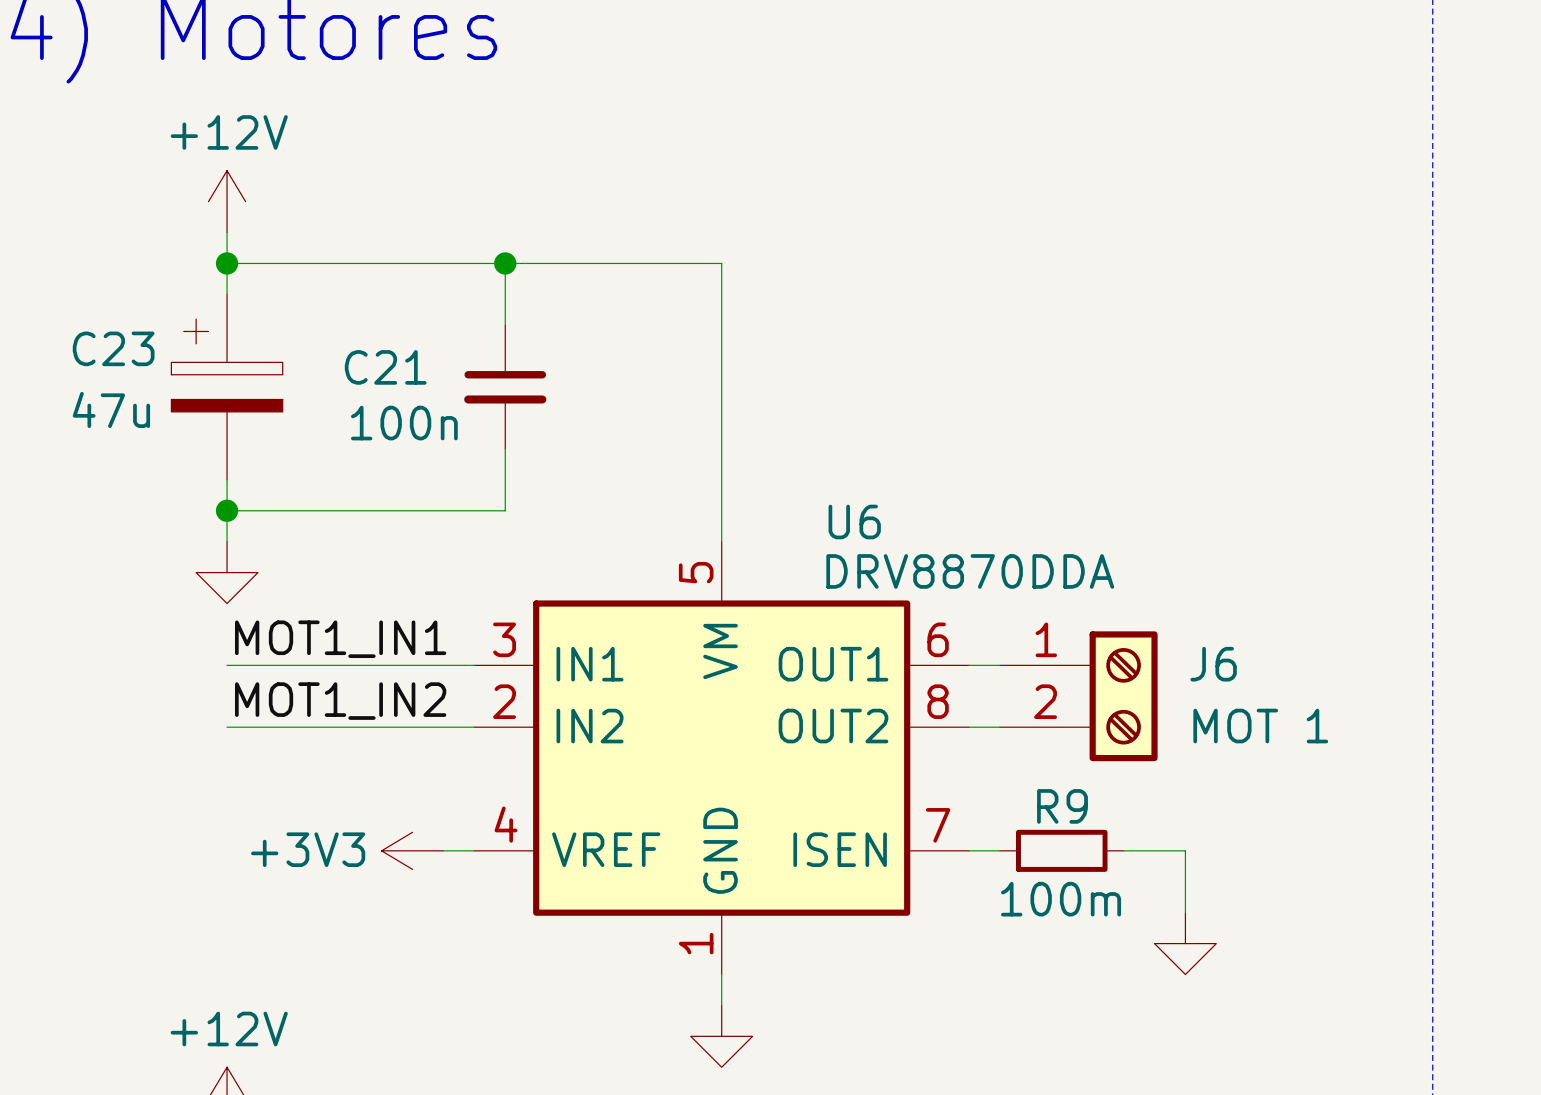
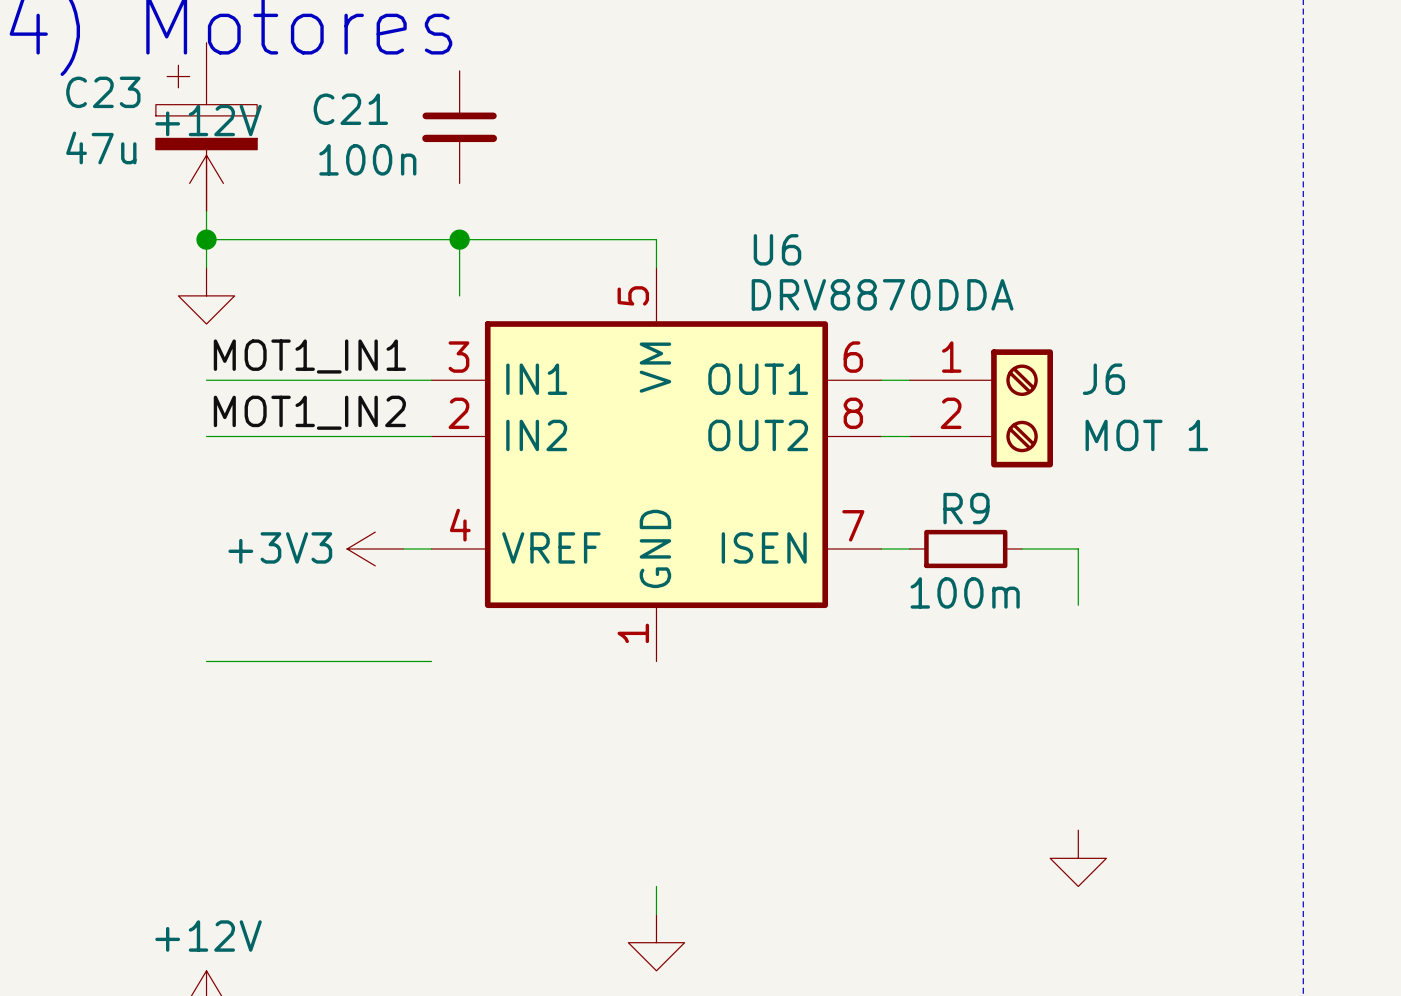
C23 position: (227, 387) -> (206, 127)
C21 position: (505, 387) -> (459, 127)
wire: (505, 448) (505, 510) (227, 510) -> none
wire: (227, 479) (227, 541) -> (206, 436) (431, 436)
junction: (227, 510) -> none
power symbol position: (227, 572) -> (206, 295)
label position: MOT1_IN1 (340, 639) -> MOT1_IN1 (309, 356)
wire: (227, 665) (474, 665) -> (206, 380) (431, 380)
wire: (969, 665) (999, 665) -> (881, 380) (909, 380)
J6 position: (1078, 696) -> (981, 408)
label position: MOT1_IN2 (340, 701) -> MOT1_IN2 (309, 412)
wire: (969, 727) (999, 727) -> (881, 436) (909, 436)
U6 position: (721, 758) -> (656, 464)
power symbol position: +3V3 (412, 850) -> +3V3 (375, 548)
wire: (443, 850) (474, 850) -> (403, 548) (431, 548)
wire: (969, 850) (999, 850) -> (881, 548) (909, 548)
R9 position: (1061, 850) -> (965, 548)
wire: (1123, 850) (1185, 850) (1185, 912) -> (1022, 548) (1078, 548) (1078, 605)

